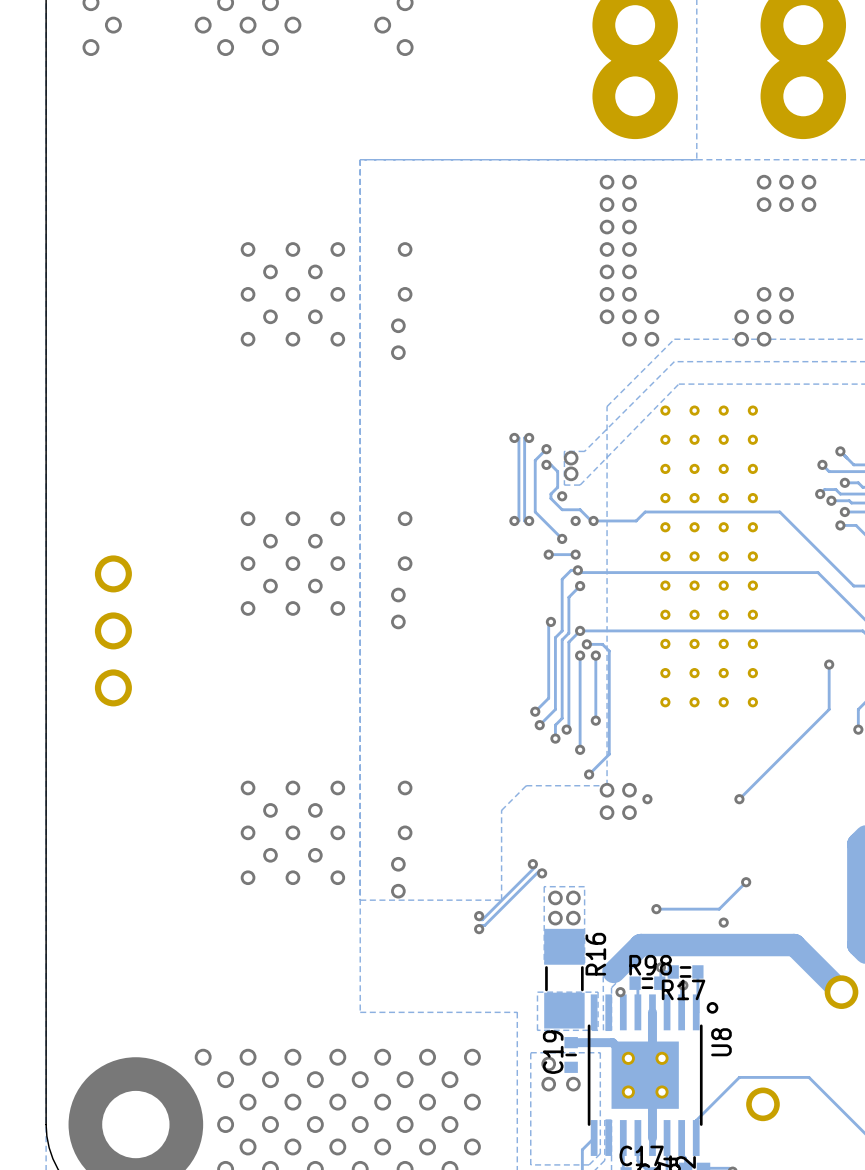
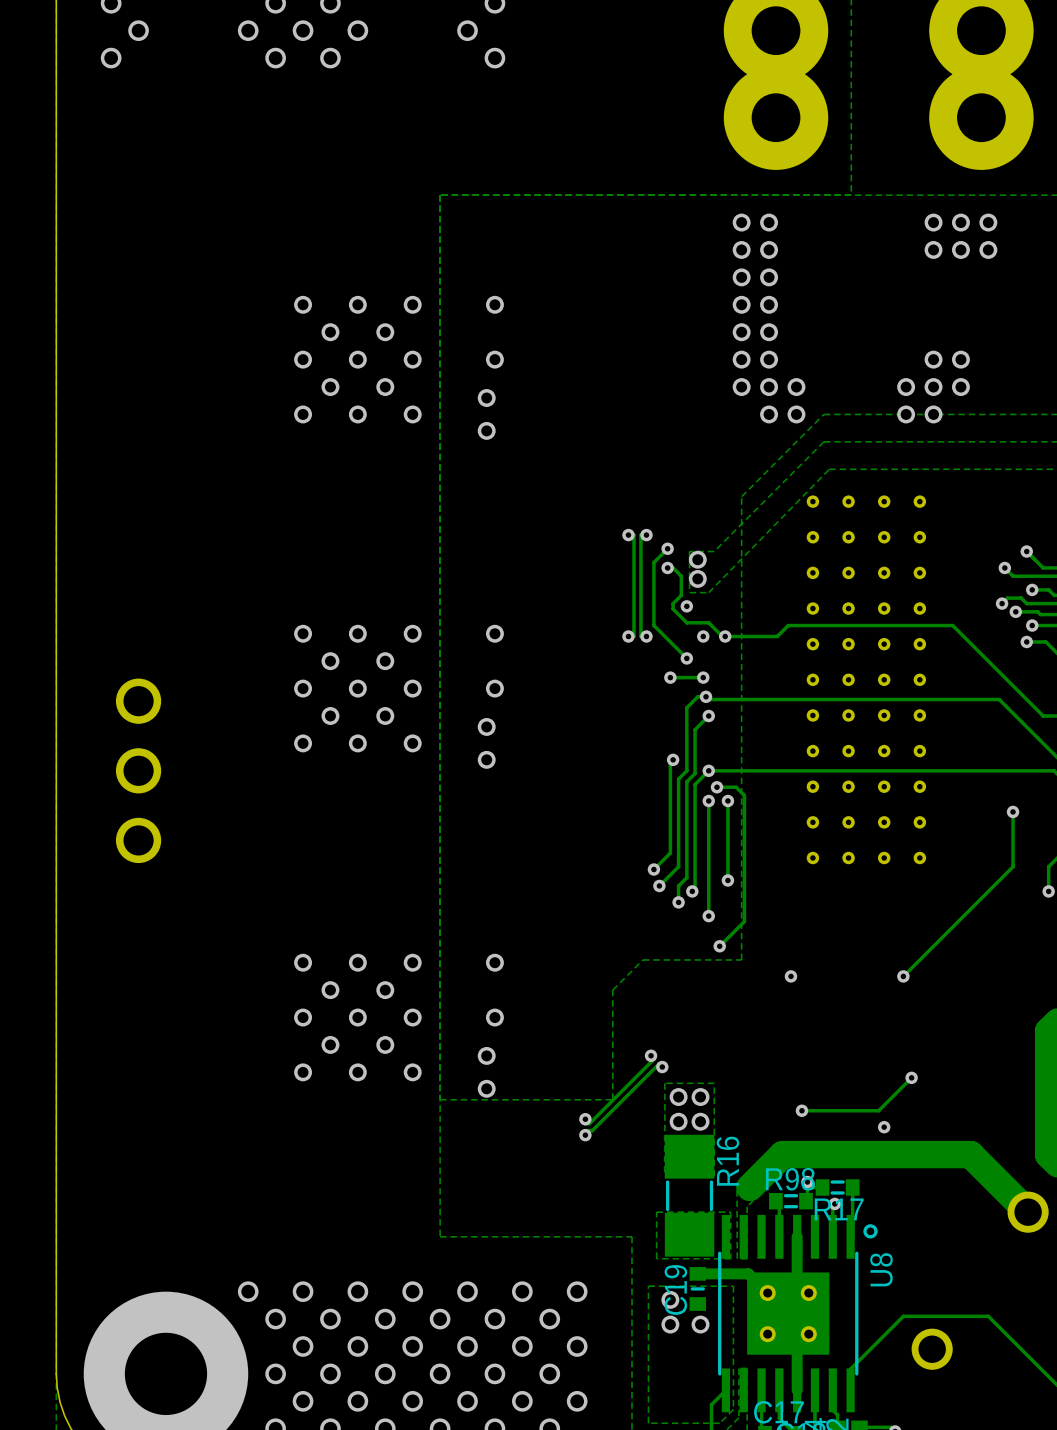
via: (607, 790) -> none
via: (629, 790) -> none
via: (607, 812) -> none
via: (629, 812) -> none
via: (620, 992) -> none

